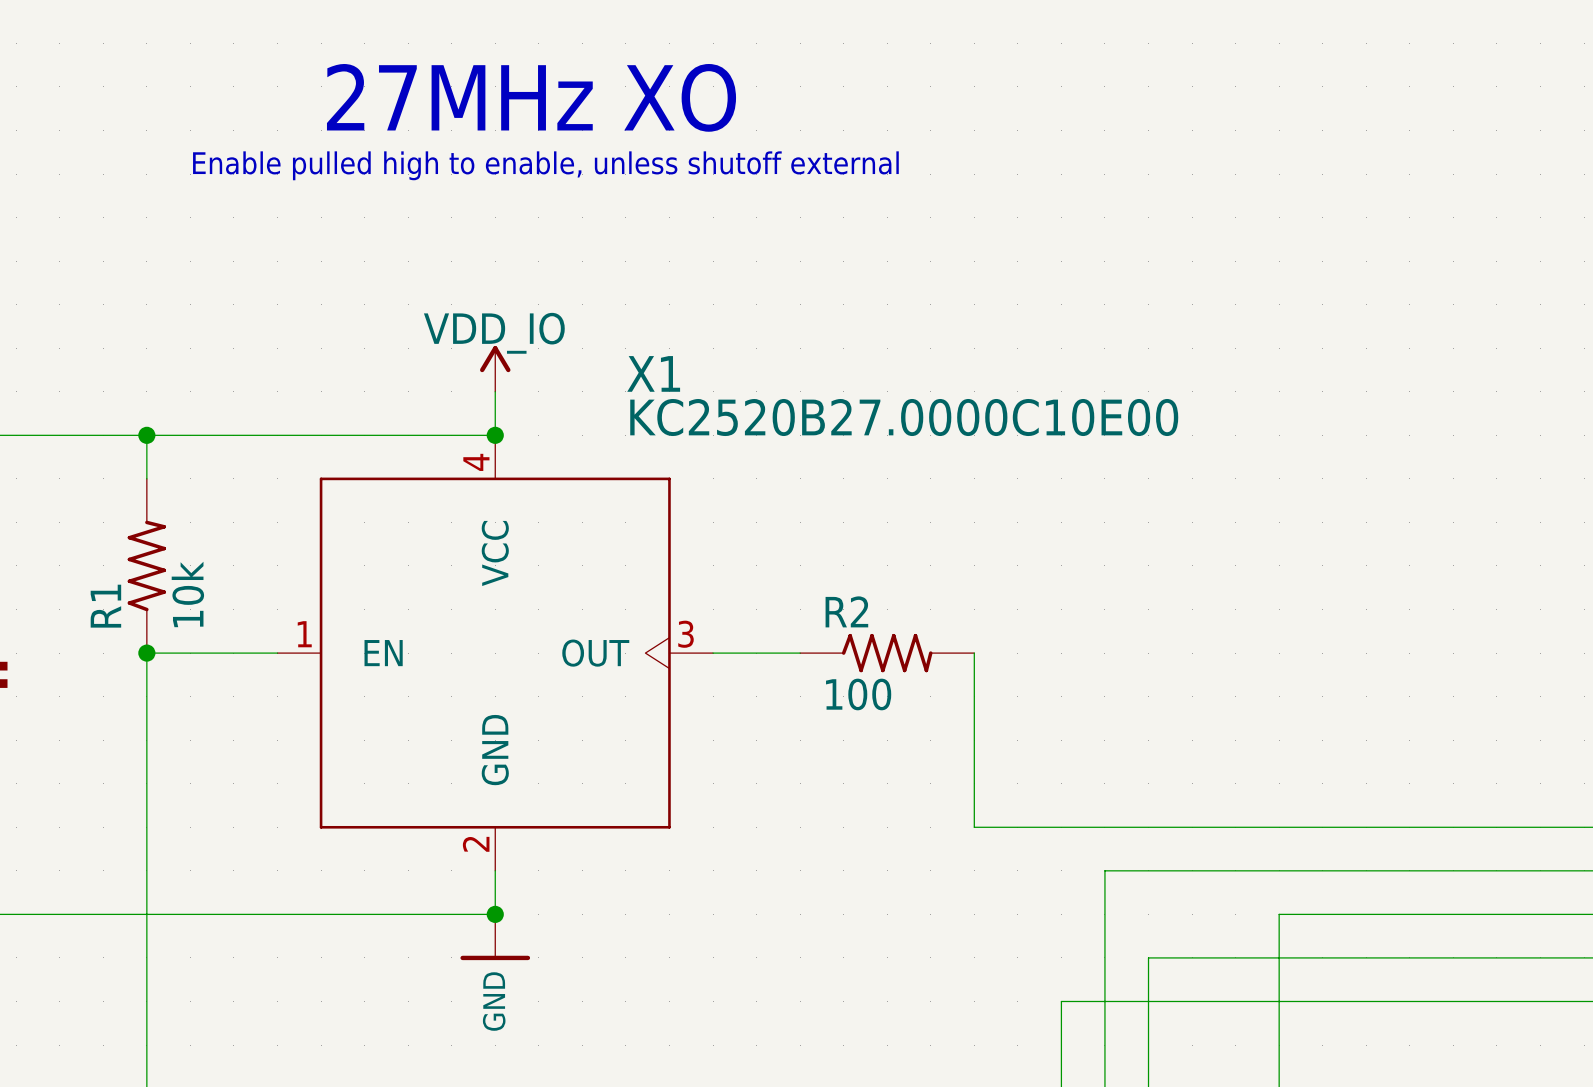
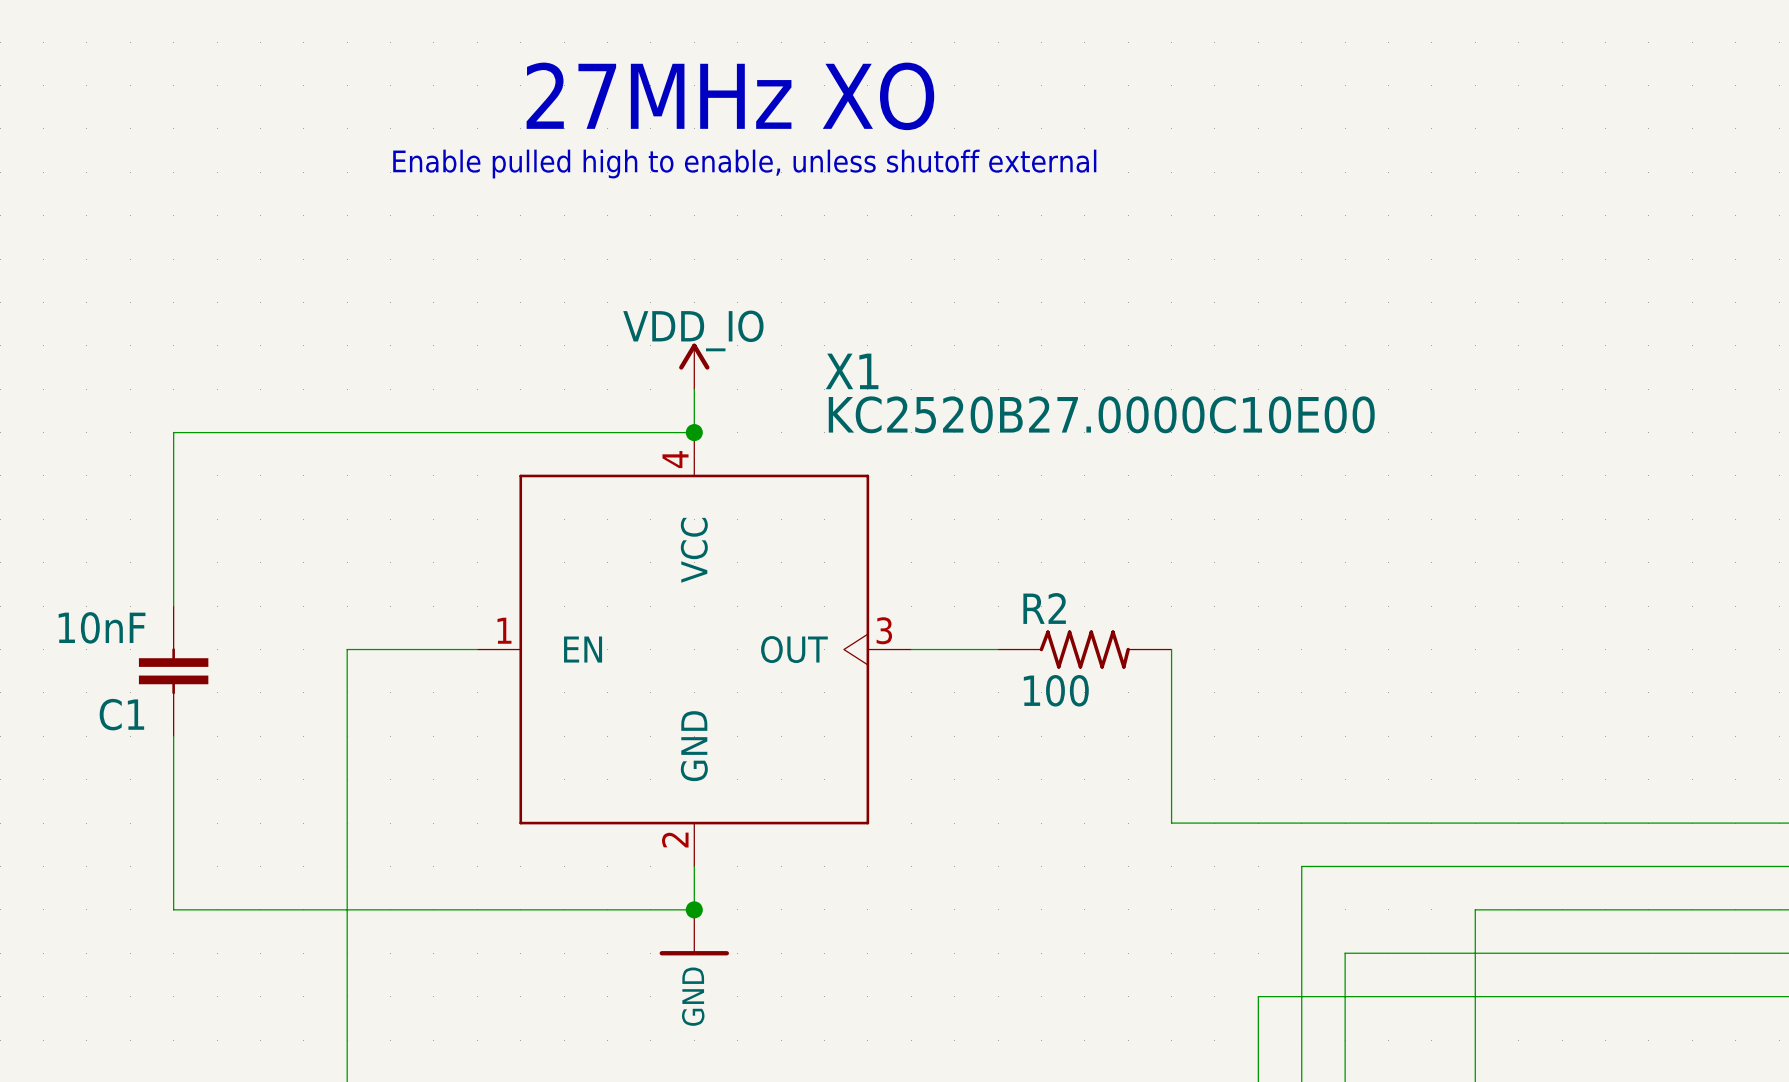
wire: (146, 435) (146, 478) -> none
junction: (146, 435) -> none
R1: 10k (146, 565) -> none
junction: (146, 653) -> none

